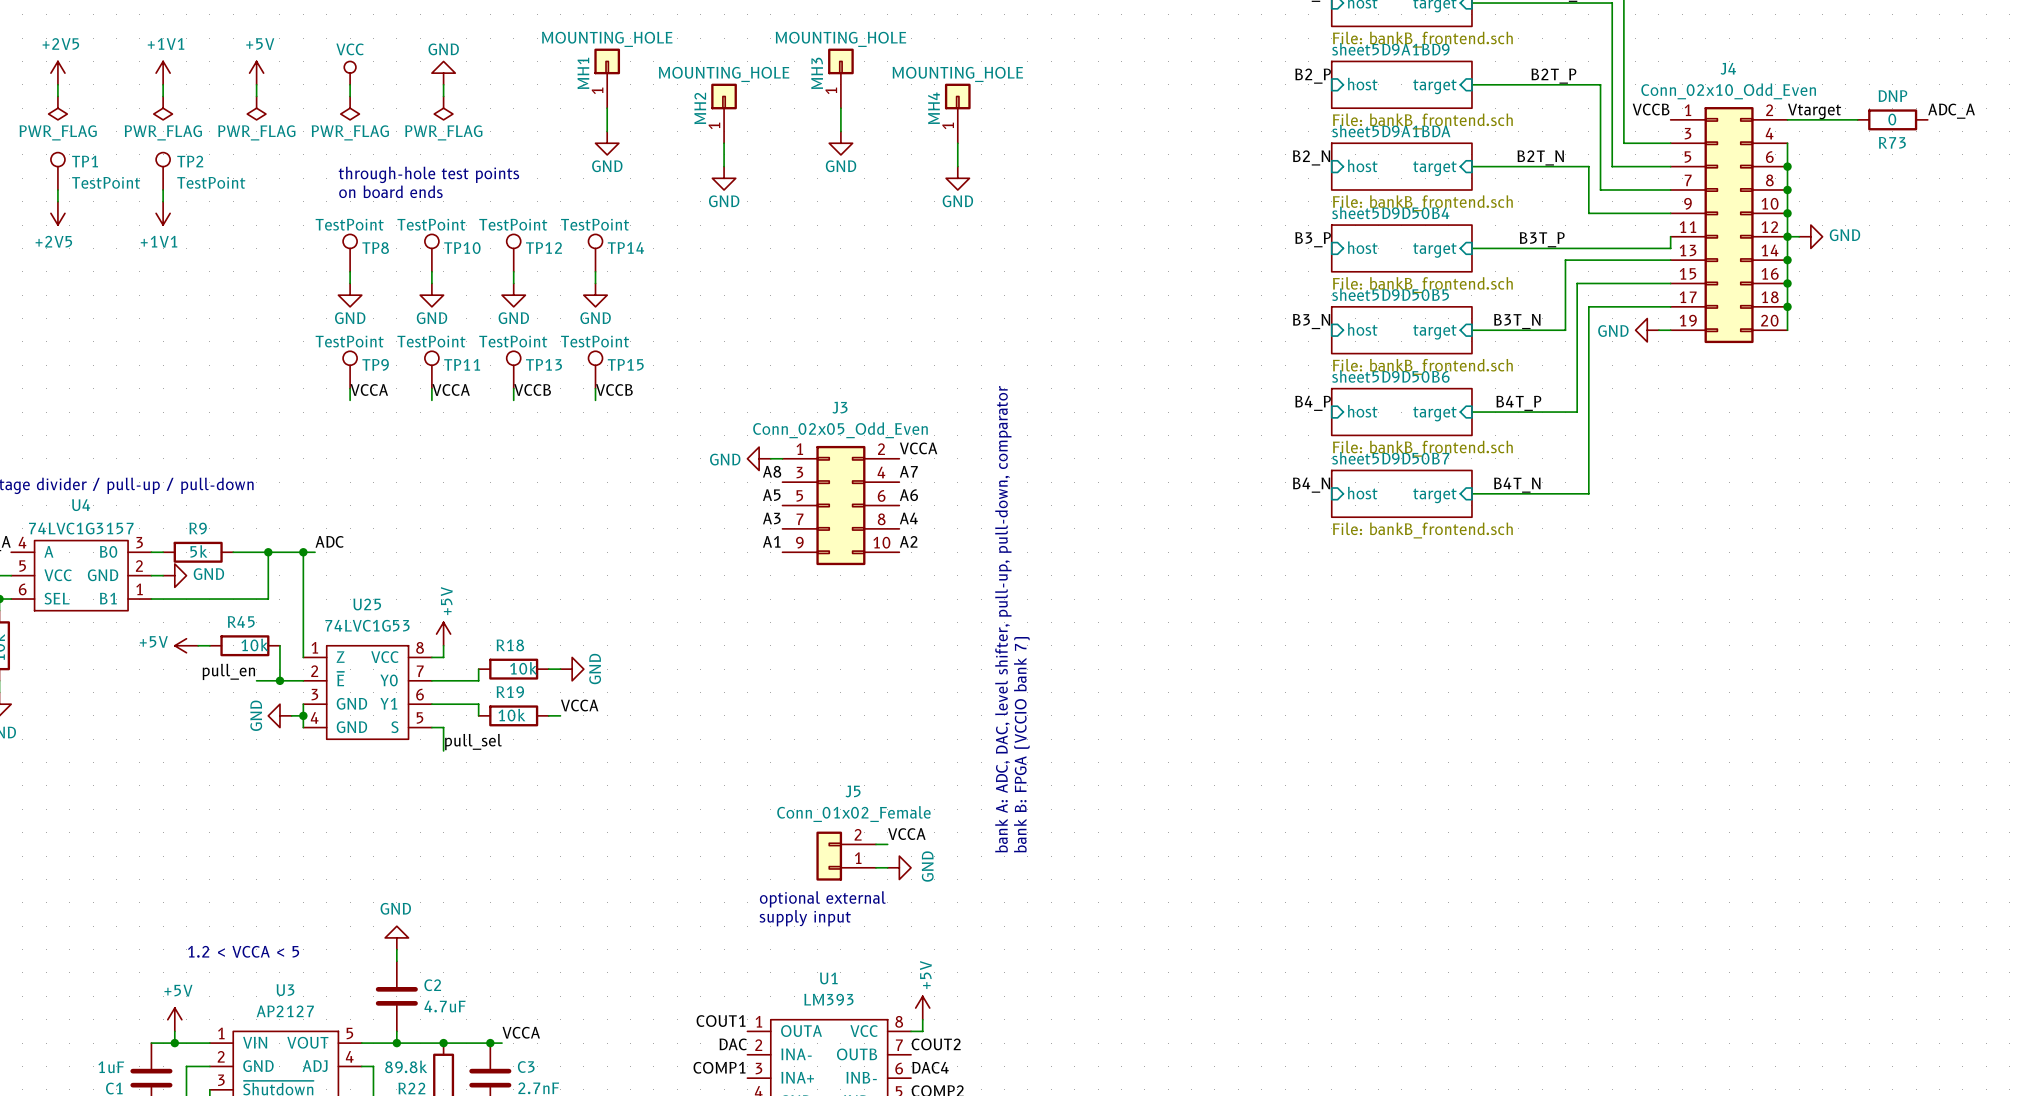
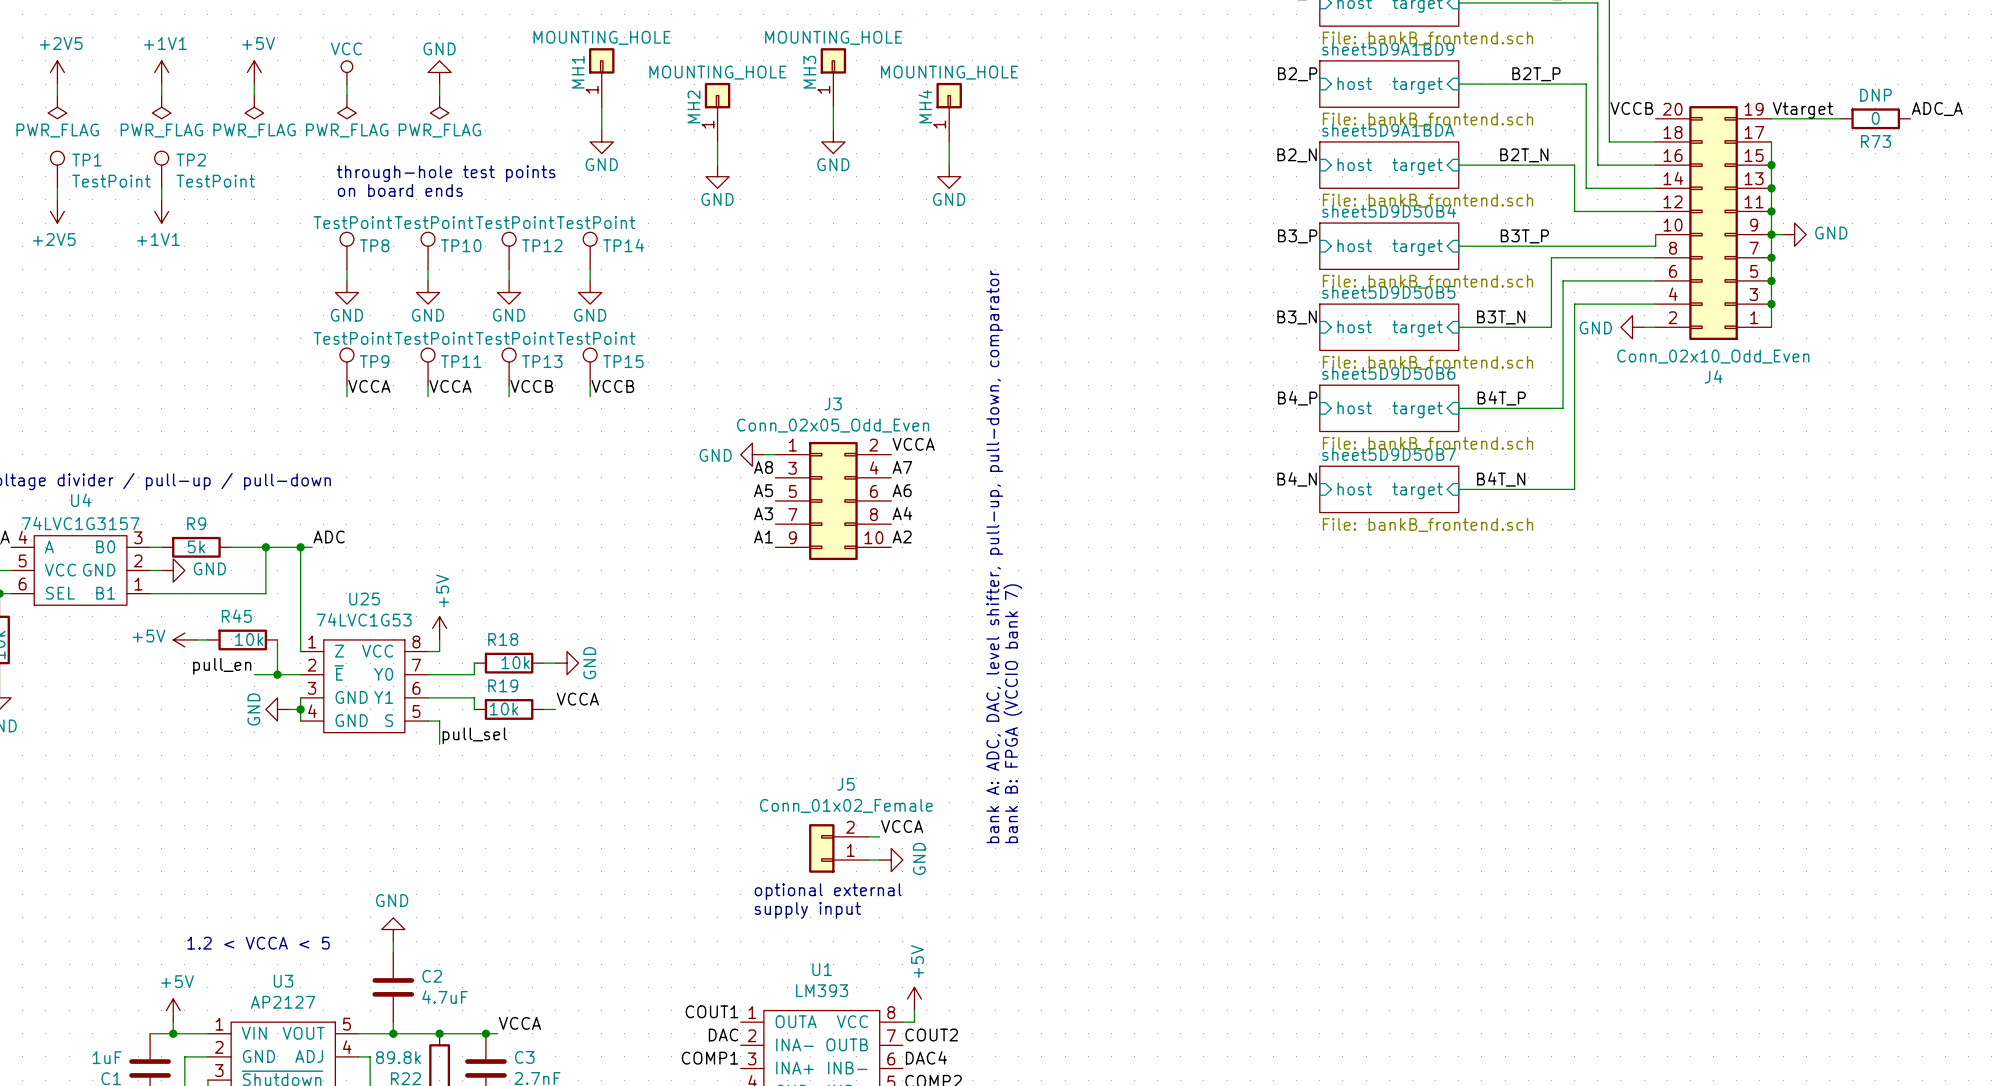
J4 rotation: 0° (1729, 225) -> 180° (1713, 223)

